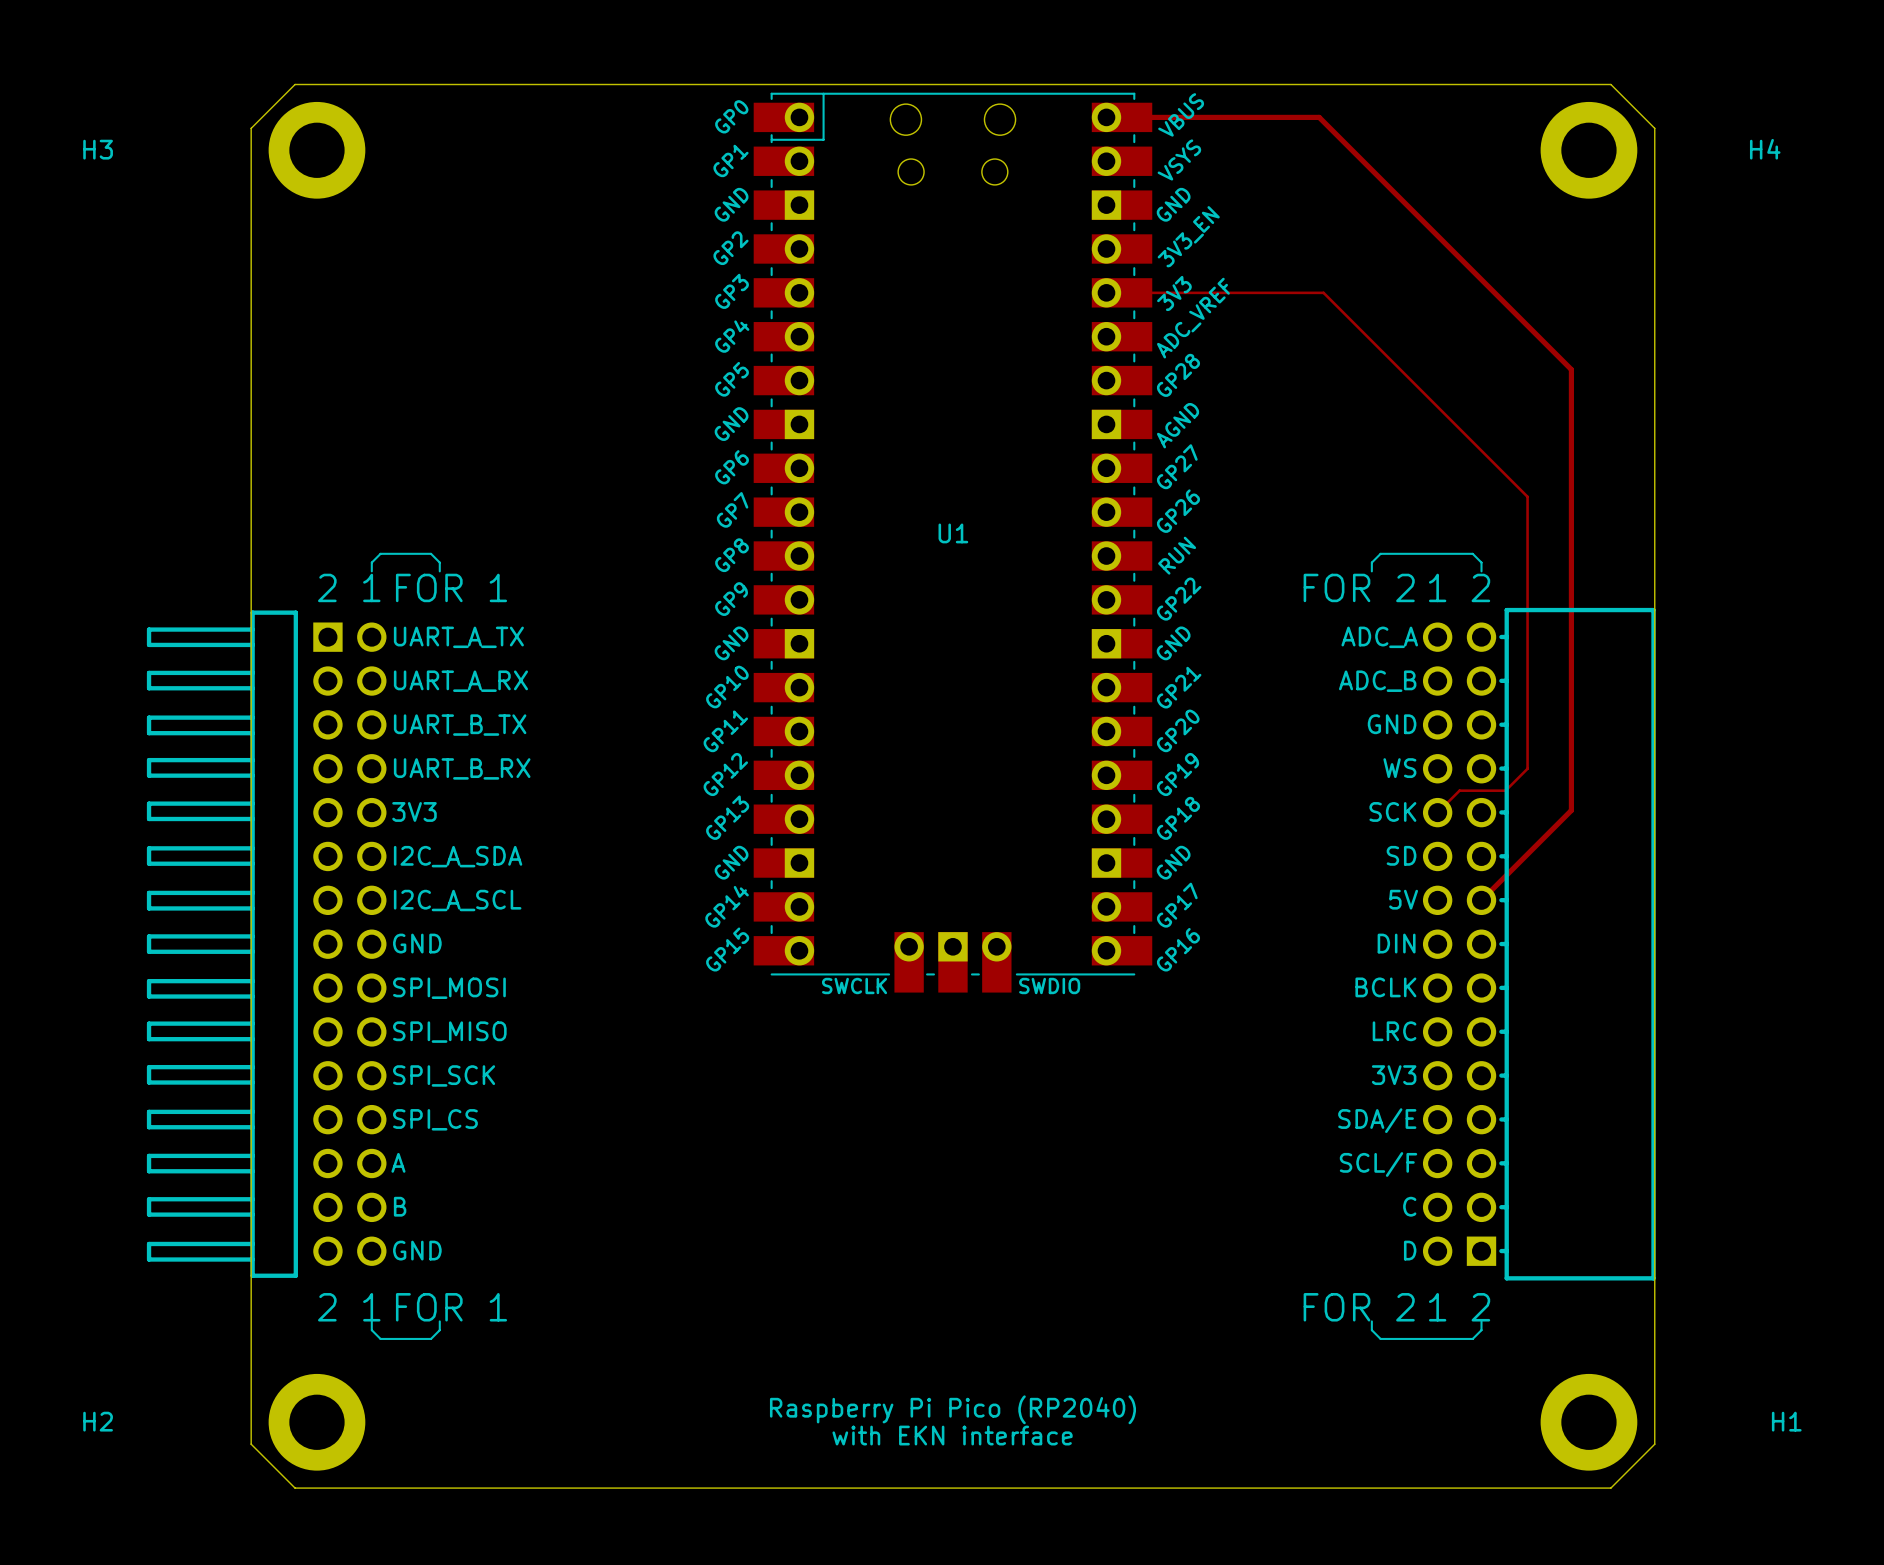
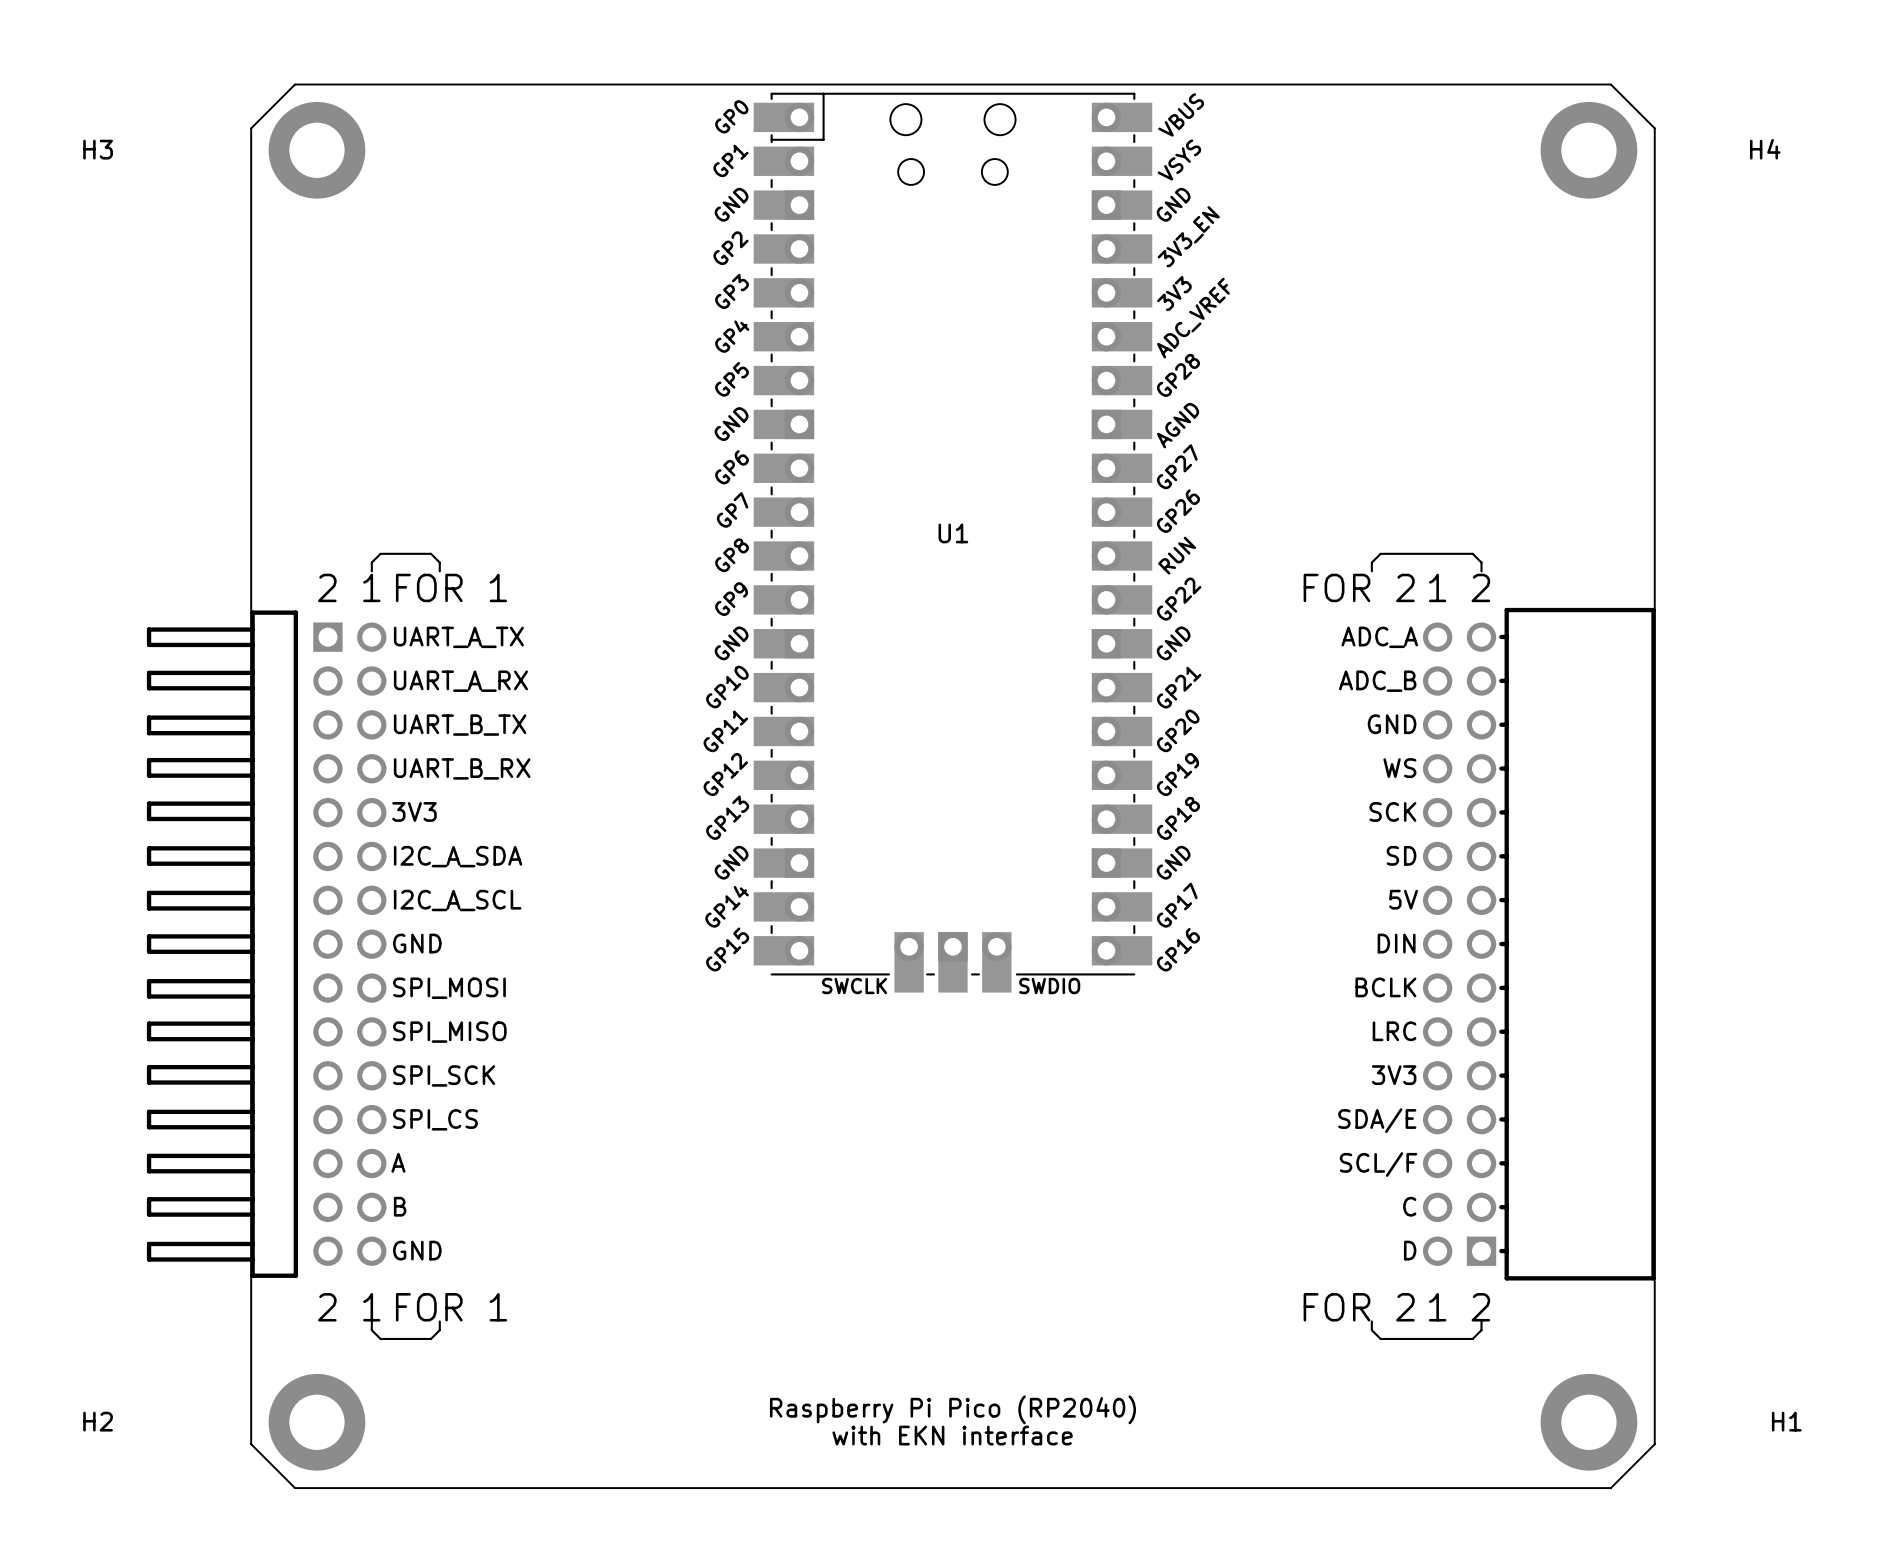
track: (1106, 117) (1319, 117) (1571, 369) (1571, 810) (1481, 900) -> none
track: (1106, 292) (1323, 292) (1527, 496) (1527, 768) (1505, 790) (1459, 790) (1437, 812) -> none

